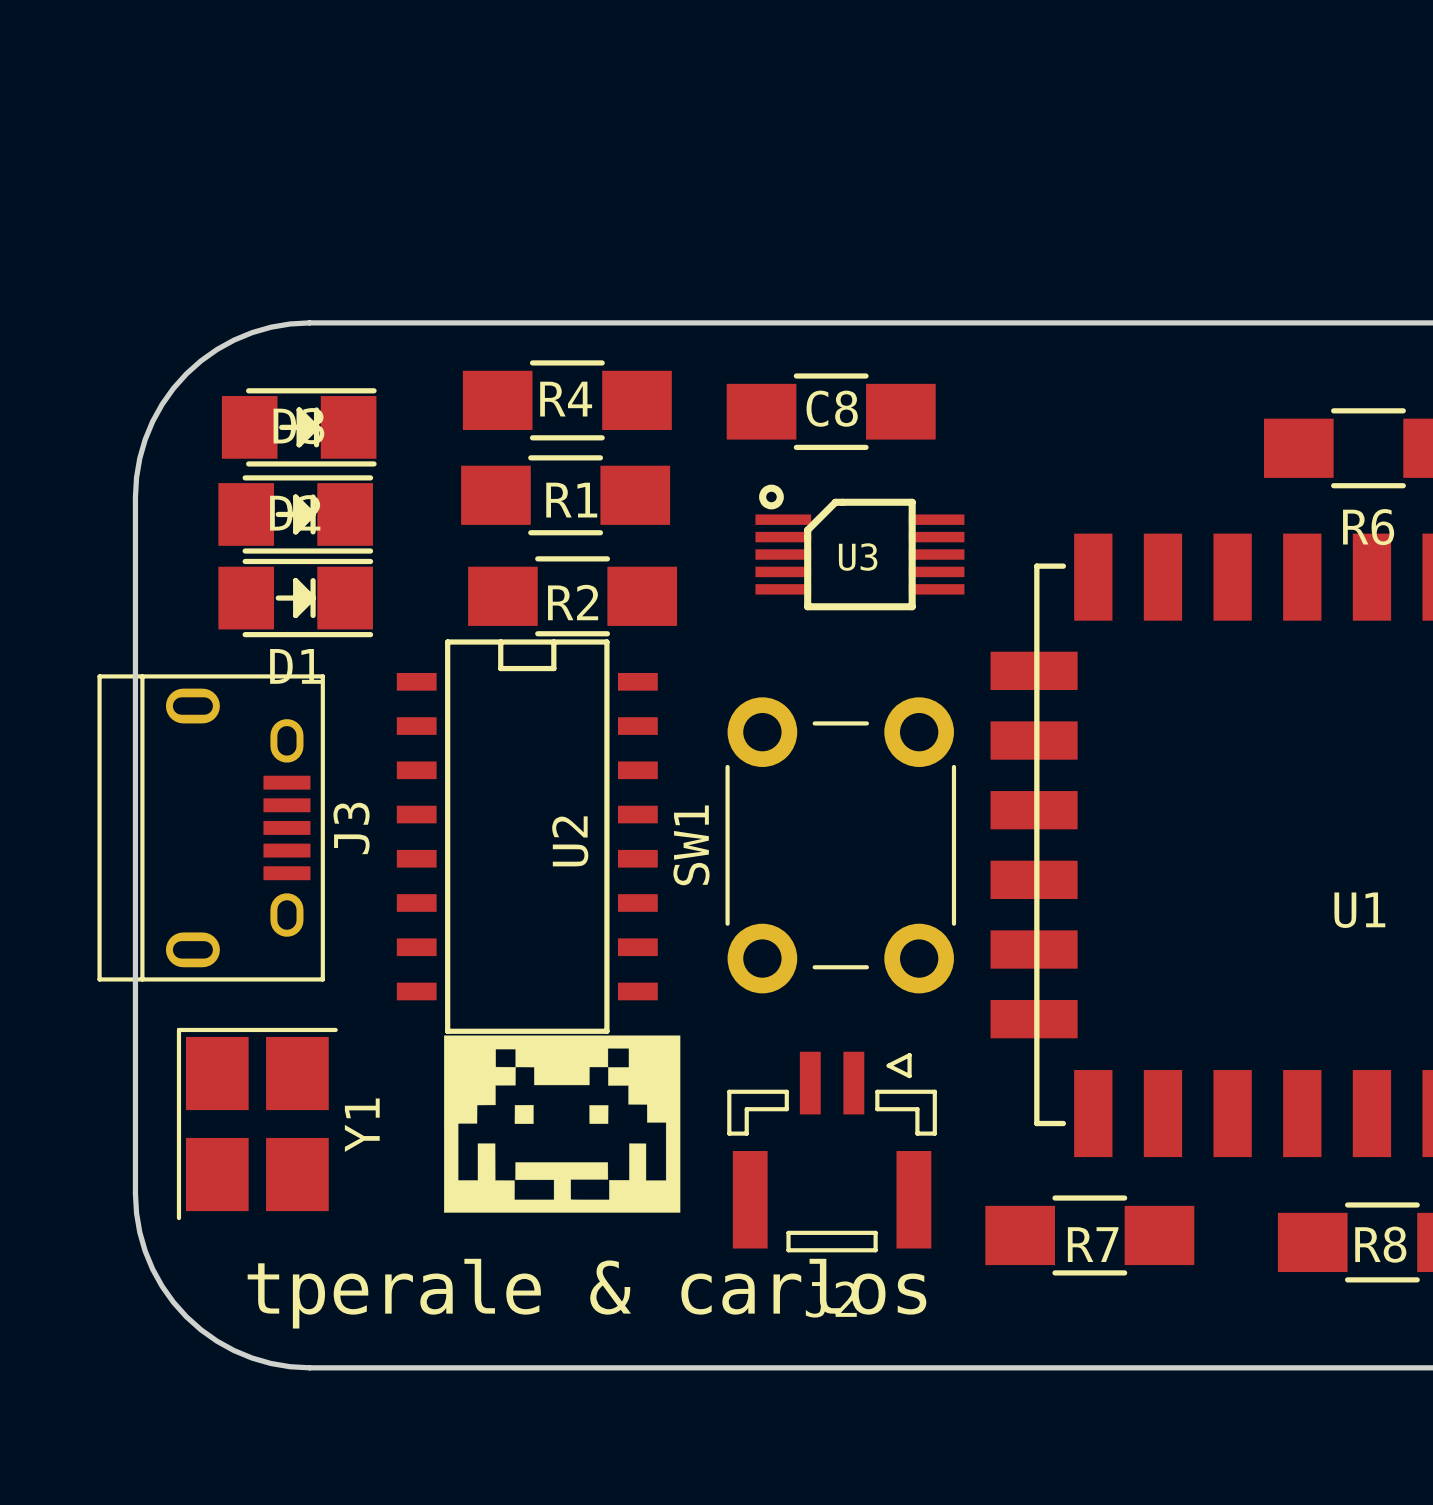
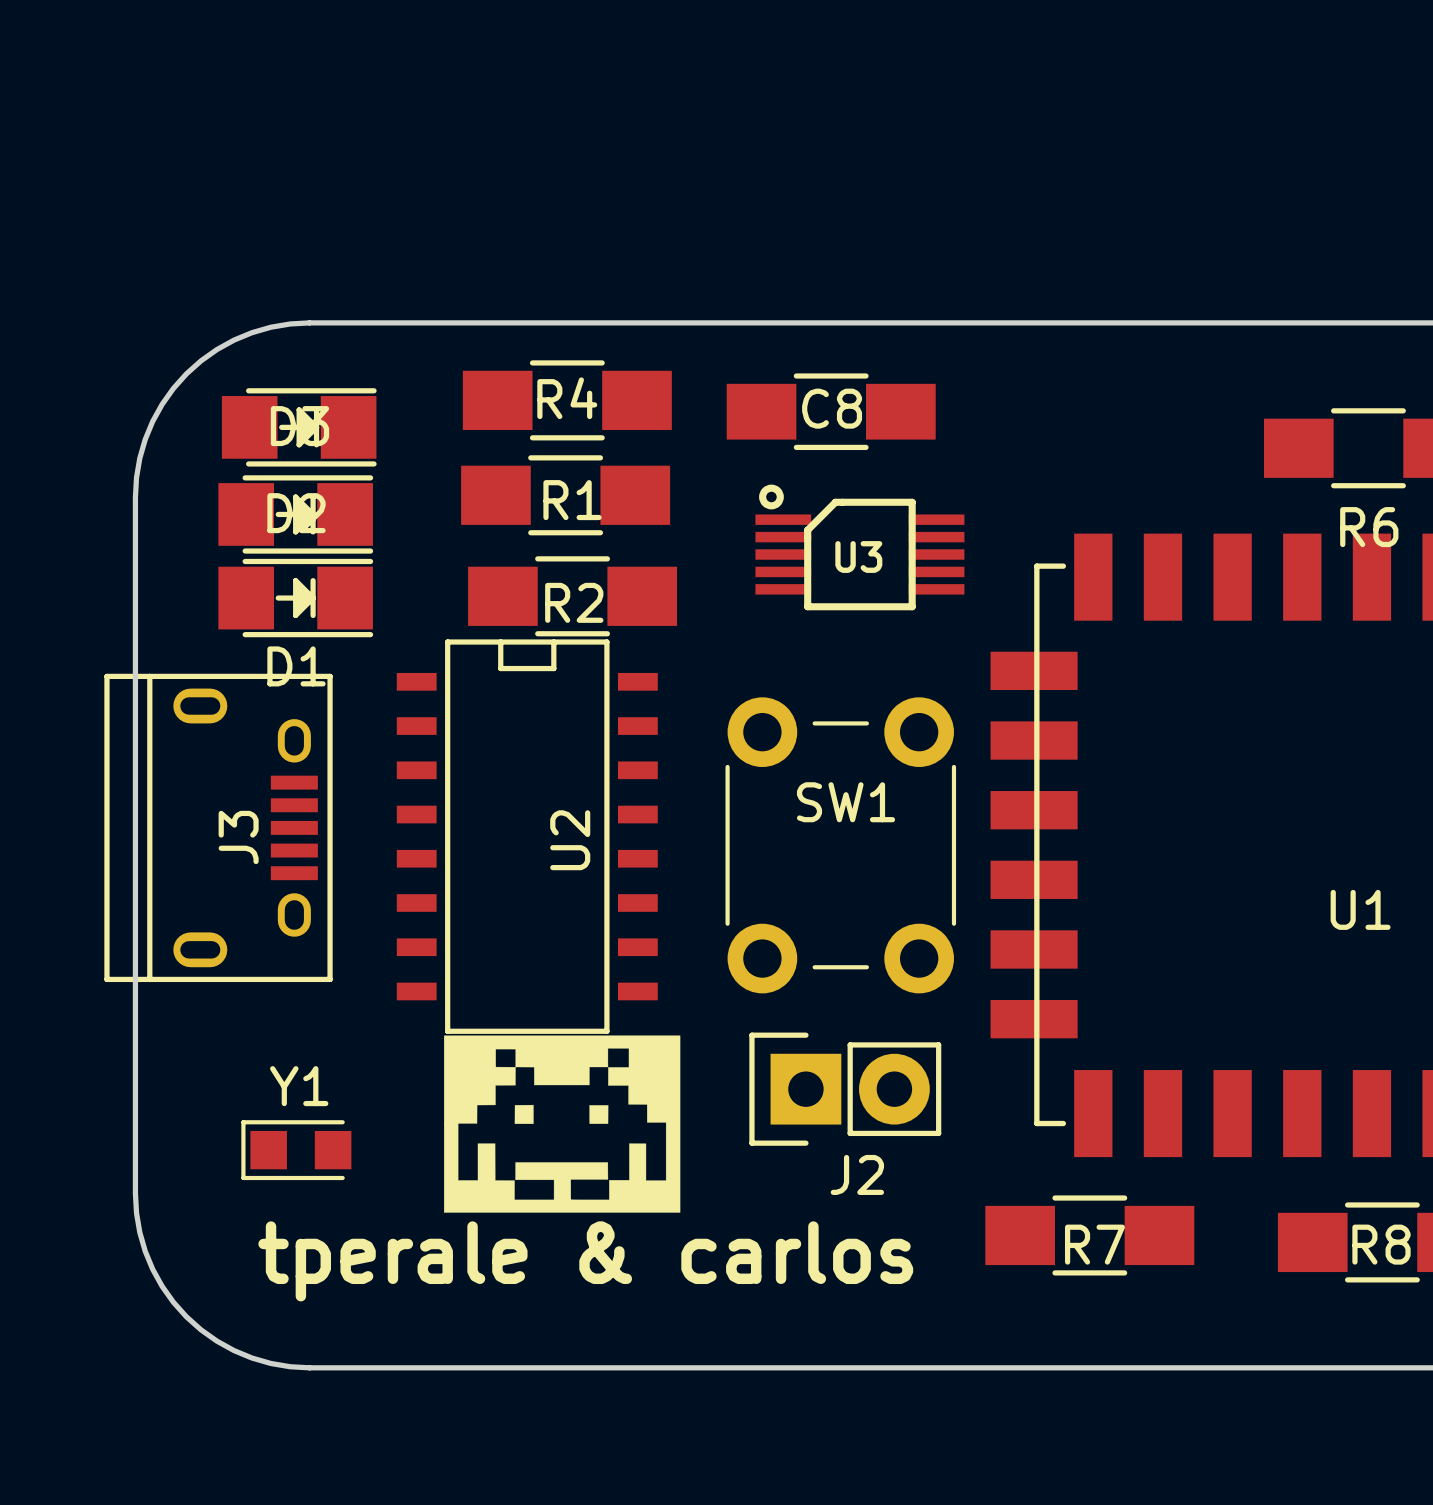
J3 footprint: [97, 674, 325, 982] -> [104, 673, 333, 983]
J3 name position: J3 (351, 828) -> J3 (238, 837)
SW1 name rotation: 0° (691, 845) -> 90° clockwise (846, 802)
SW1 name position: SW1 (691, 845) -> SW1 (846, 802)
Y1 footprint: [176, 1027, 338, 1221] -> [241, 1120, 352, 1181]
J2 footprint: [727, 1051, 937, 1253] -> [749, 1032, 942, 1146]
Y1 name position: Y1 (362, 1125) -> Y1 (299, 1086)
text position: tperale & carlos (586, 1293) -> tperale & carlos (585, 1261)

